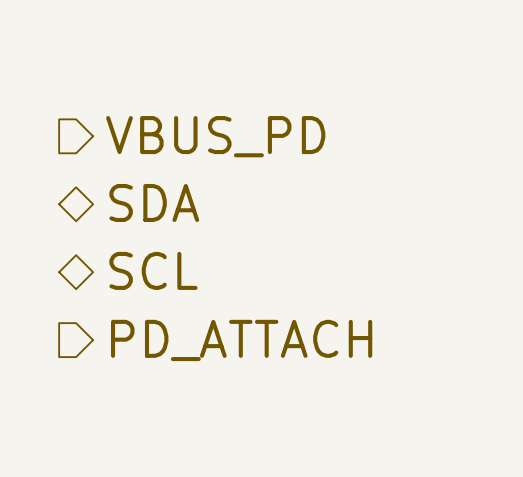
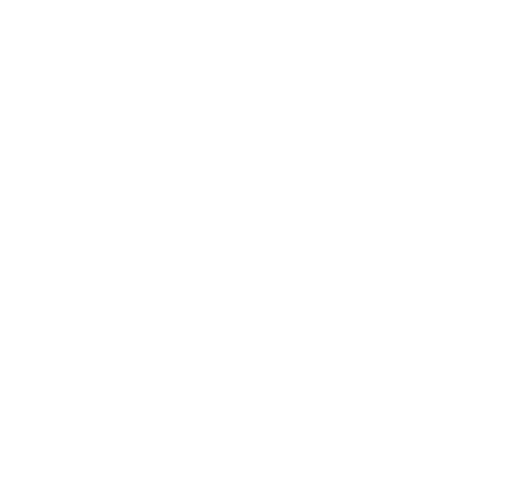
hierarchical label: VBUS_PD (215, 136) -> none
hierarchical label: SDA (154, 202) -> none
hierarchical label: SCL (153, 270) -> none
hierarchical label: PD_ATTACH (241, 340) -> none

